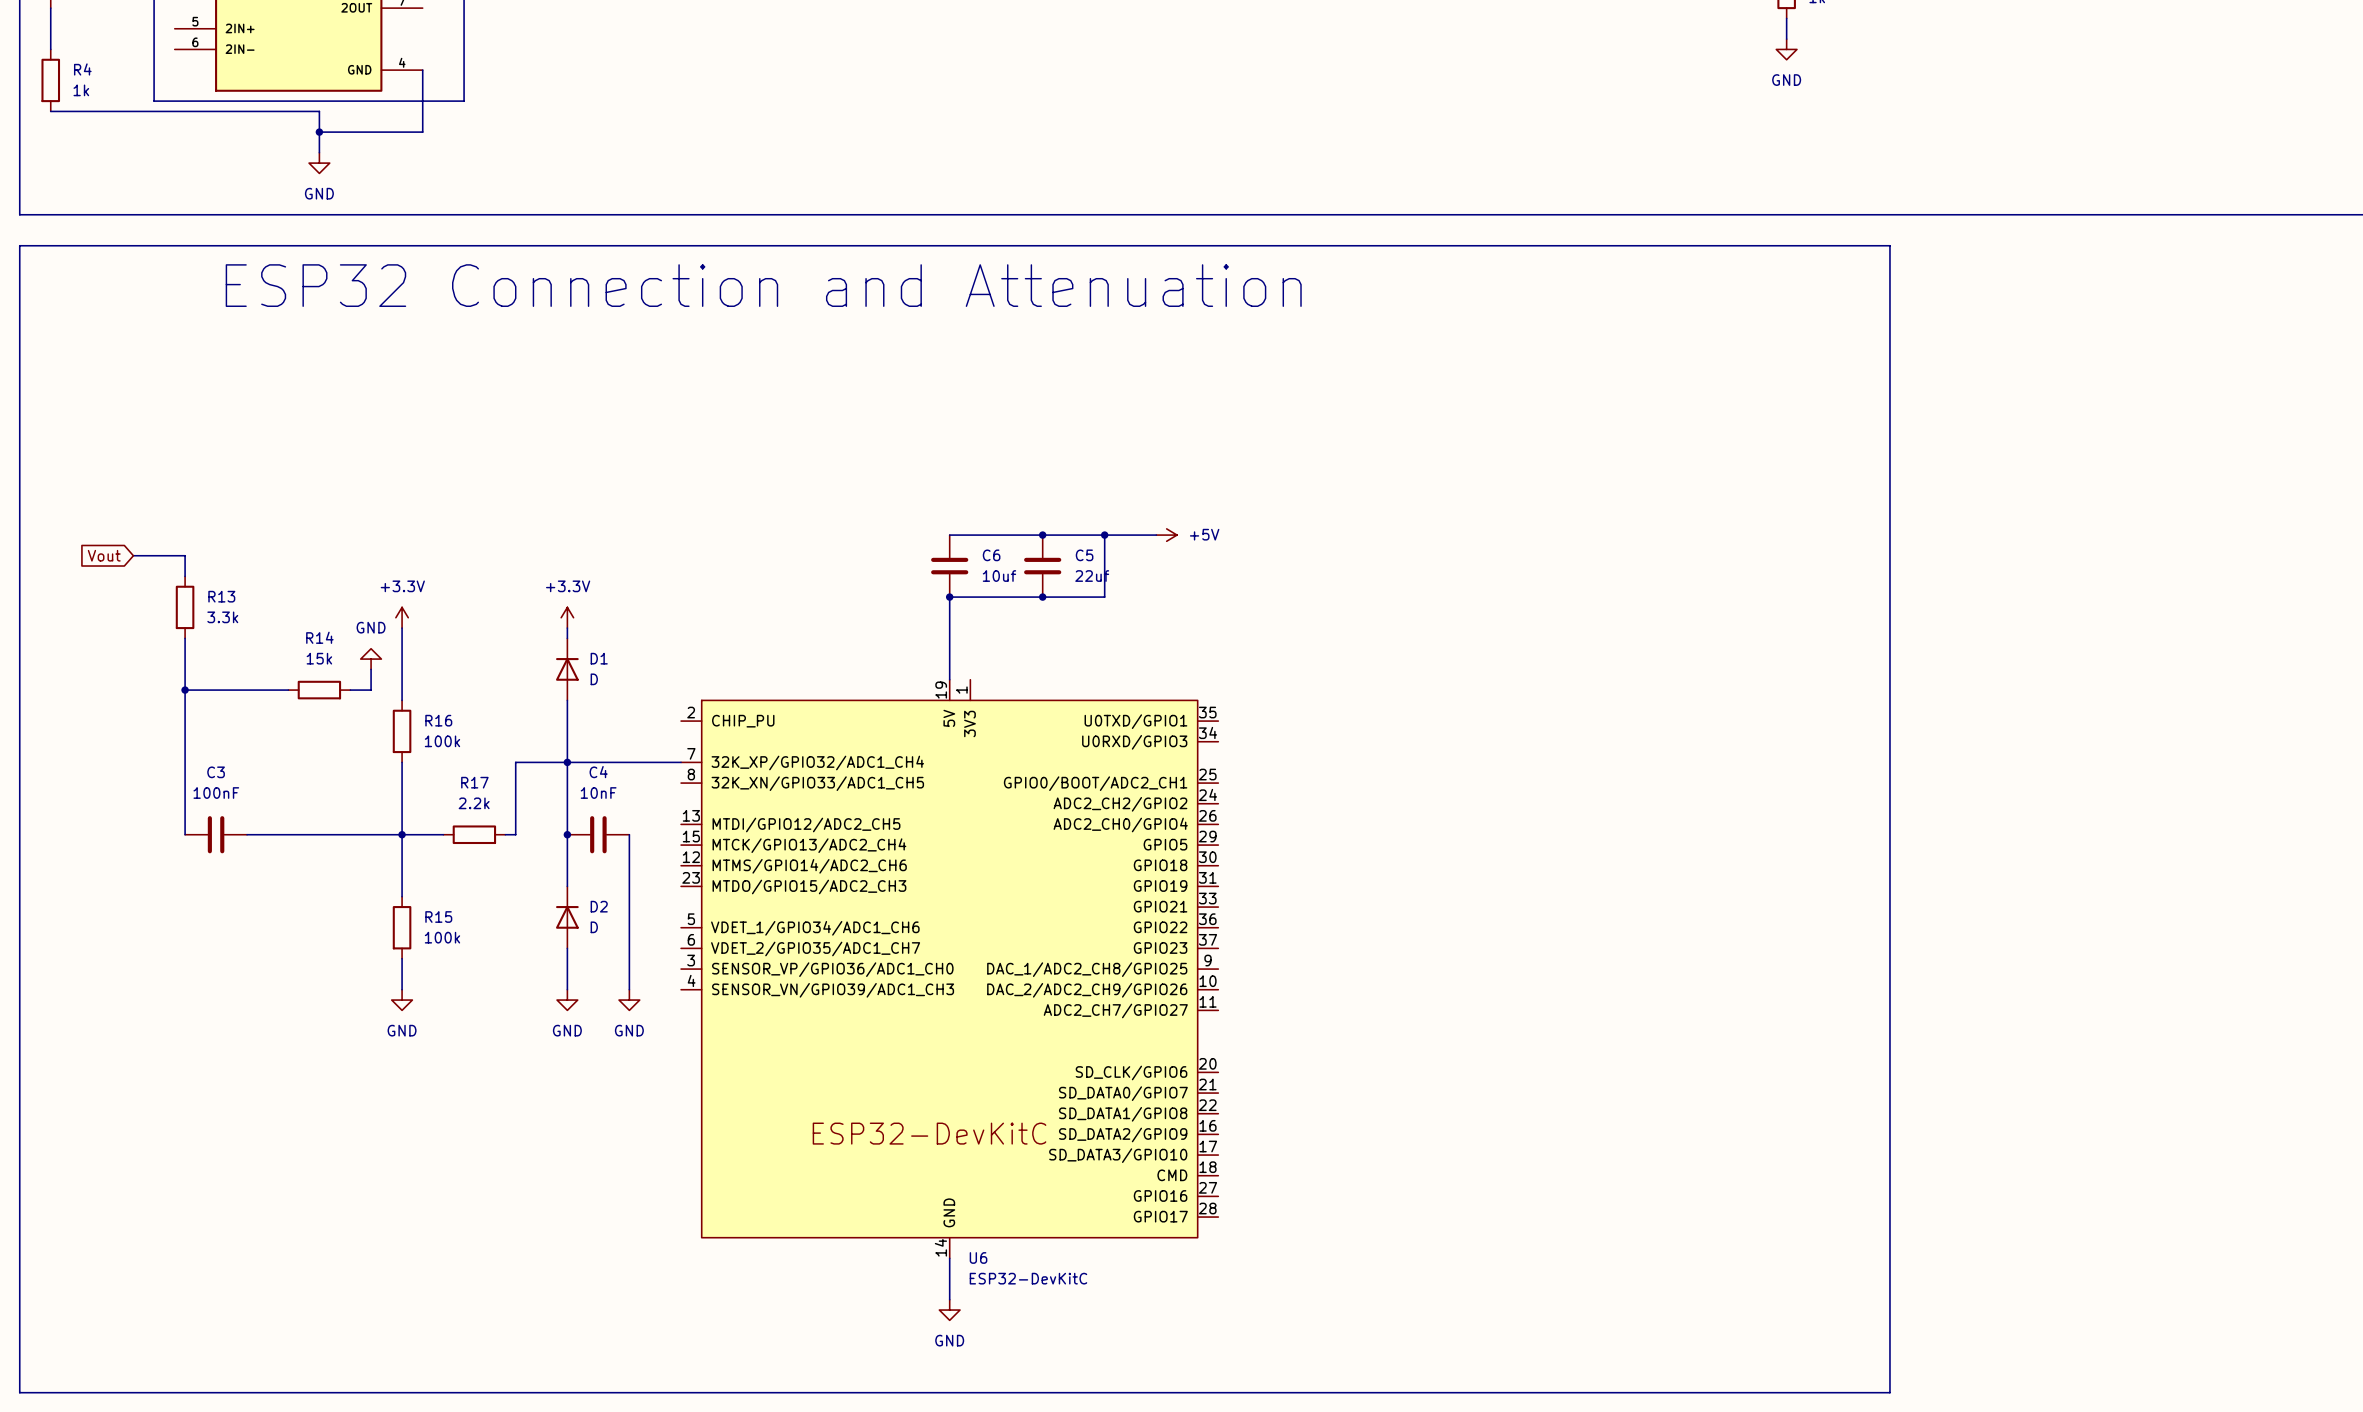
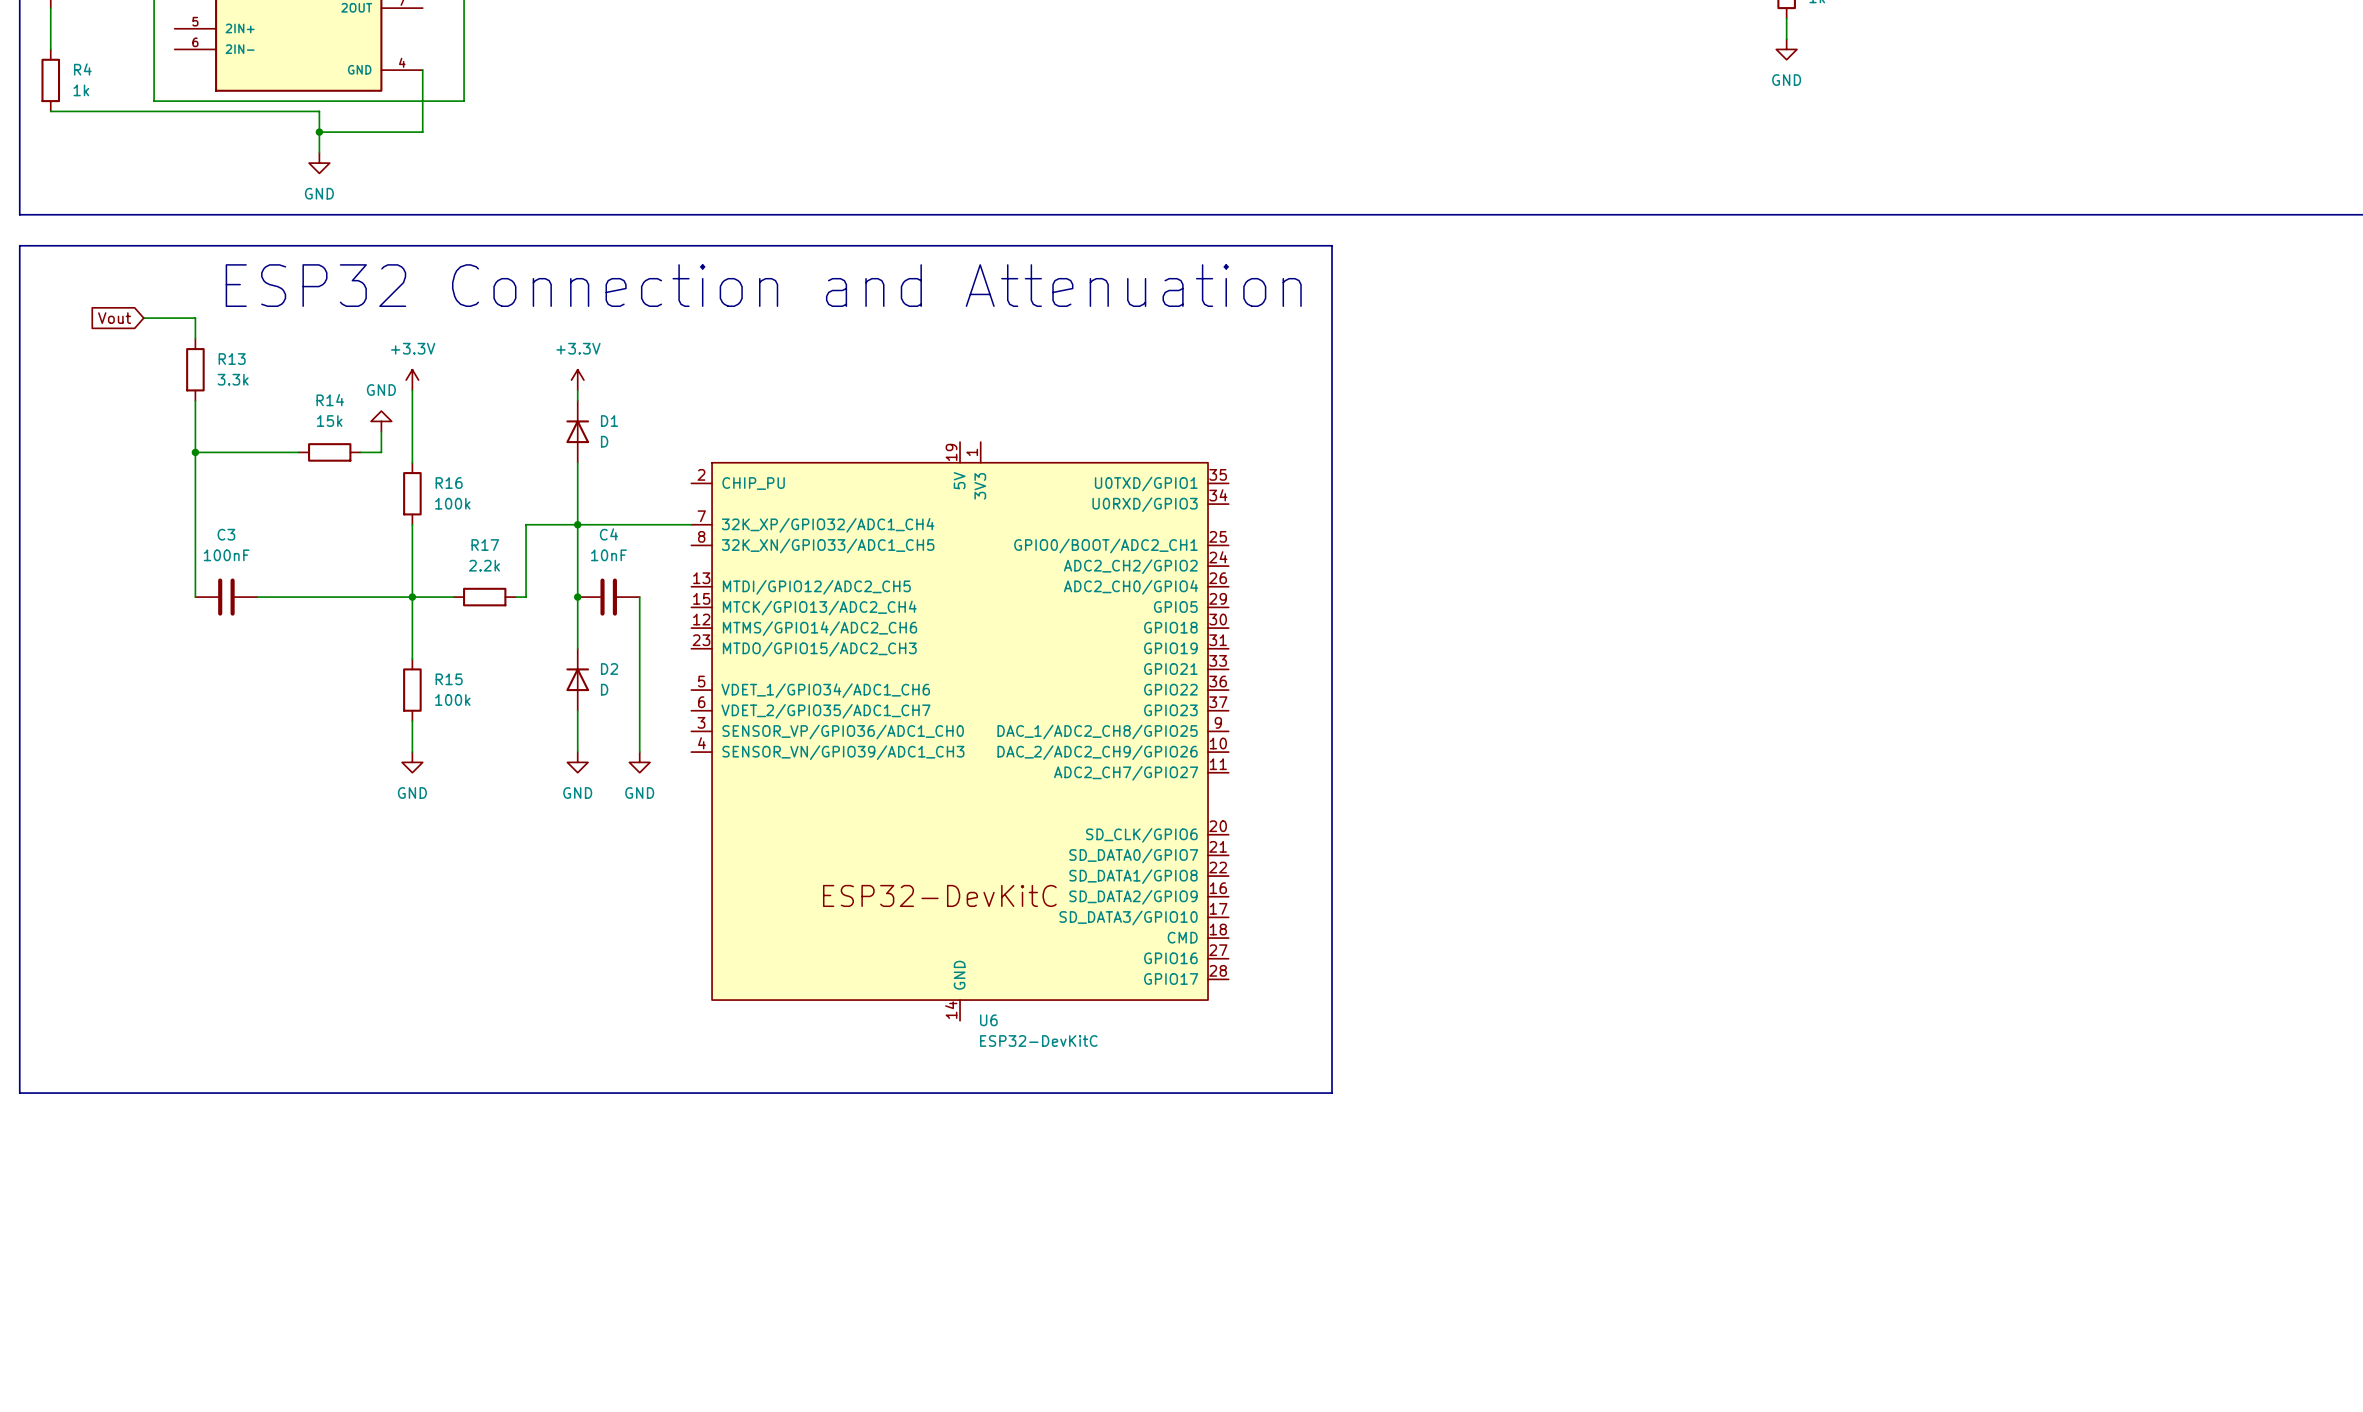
line: (1332, 245) (1889, 245) (1889, 1392) (19, 1392) (19, 1093) -> (1332, 245) (1332, 1093) (19, 1093)
global label: none -> Vout (114, 318)
wire: none -> (143, 318) (195, 318) (195, 338)
power symbol: none -> +3.3V (412, 380)
power symbol: none -> +3.3V (577, 380)
wire: none -> (412, 390) (412, 462)
wire: none -> (577, 390) (577, 400)
wire: none -> (195, 400) (195, 597)
power symbol: none -> GND (381, 421)
wire: none -> (381, 431) (381, 452) (360, 452)
wire: none -> (195, 452) (298, 452)
junction: none -> (195, 452)
wire: none -> (577, 462) (577, 648)
wire: none -> (412, 524) (412, 659)
junction: none -> (577, 524)
wire: none -> (691, 524) (526, 524) (526, 597) (515, 597)
junction: (1042, 535) -> none
junction: (1104, 535) -> none
power symbol: +5V (1166, 535) -> none
global label: Vout (104, 555) -> none
wire: (133, 555) (185, 555) (185, 576) -> none
C6: 10uf (949, 566) -> none
C5: 22uf (1042, 566) -> none
wire: none -> (257, 597) (453, 597)
junction: none -> (412, 597)
junction: none -> (577, 597)
wire: none -> (639, 597) (639, 752)
junction: (949, 597) -> none
junction: (1042, 597) -> none
R13 position: (185, 607) -> (195, 369)
power symbol: +3.3V (402, 617) -> none
power symbol: +3.3V (567, 617) -> none
wire: (402, 628) (402, 700) -> none
wire: (567, 628) (567, 638) -> none
wire: (185, 638) (185, 834) -> none
power symbol rotation: 0° (371, 659) -> 180° (412, 762)
power symbol position: GND (371, 659) -> GND (412, 762)
wire: (371, 669) (371, 690) (350, 690) -> none
D1 position: (567, 669) -> (577, 431)
wire: (185, 690) (288, 690) -> none
junction: (185, 690) -> none
R14 position: (319, 690) -> (329, 452)
wire: (567, 700) (567, 886) -> none
wire: none -> (577, 710) (577, 752)
wire: none -> (412, 721) (412, 752)
R16 position: (402, 731) -> (412, 493)
wire: (402, 762) (402, 896) -> none
junction: (567, 762) -> none
power symbol: none -> GND (577, 762)
power symbol: none -> GND (639, 762)
wire: (681, 762) (515, 762) (515, 834) (505, 834) -> none
C3 position: (216, 834) -> (226, 597)
wire: (247, 834) (443, 834) -> none
junction: (402, 834) -> none
R17 position: (474, 834) -> (484, 597)
junction: (567, 834) -> none
C4 position: (598, 834) -> (608, 597)
wire: (629, 834) (629, 989) -> none
D2 position: (567, 917) -> (577, 679)
R15 position: (402, 927) -> (412, 690)
wire: (567, 948) (567, 989) -> none
wire: (402, 958) (402, 989) -> none
U6 position: (949, 969) -> (960, 731)
power symbol: GND (402, 1000) -> none
power symbol: GND (567, 1000) -> none
power symbol: GND (629, 1000) -> none
wire: (949, 1258) (949, 1299) -> none
power symbol: GND (949, 1310) -> none

